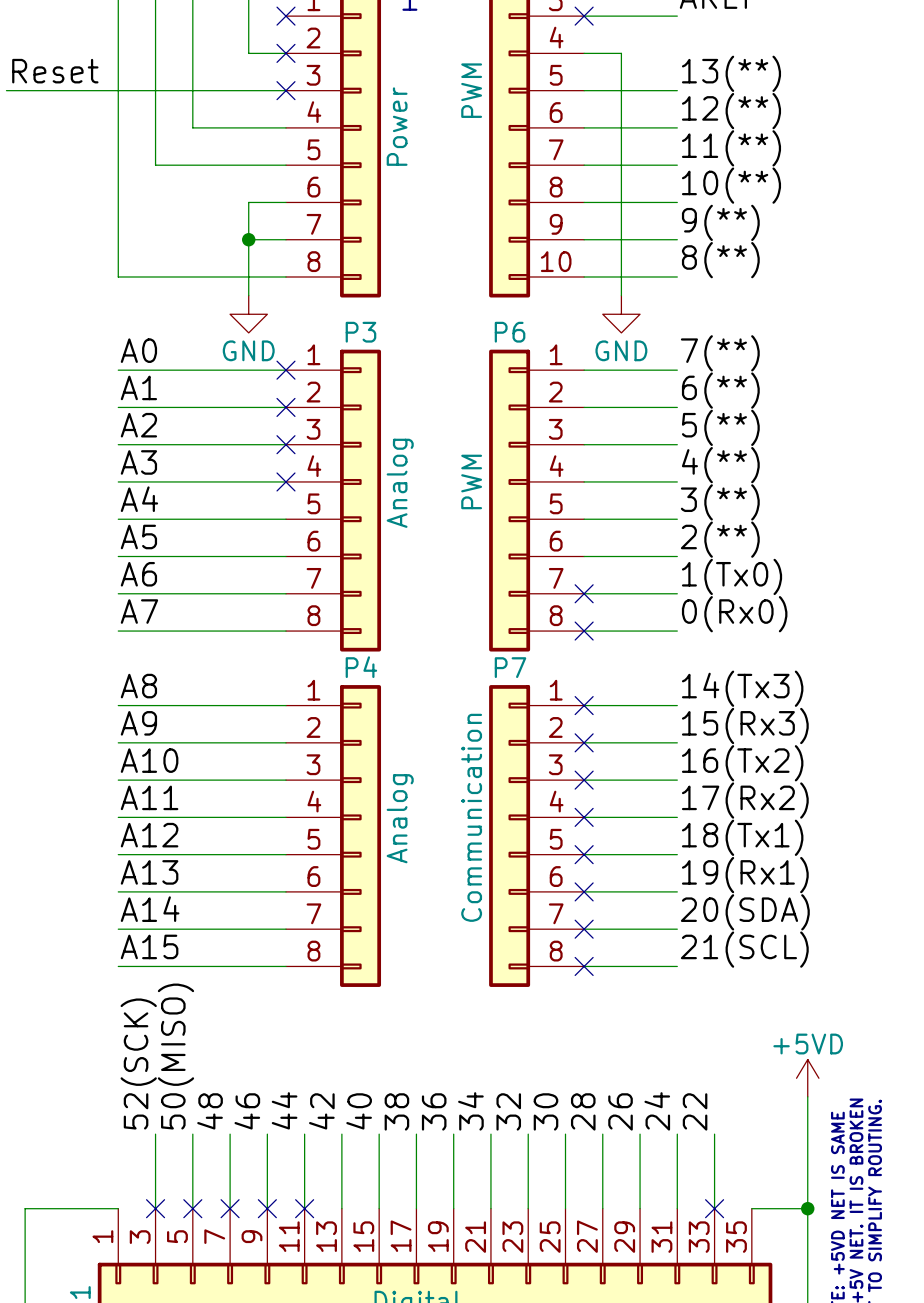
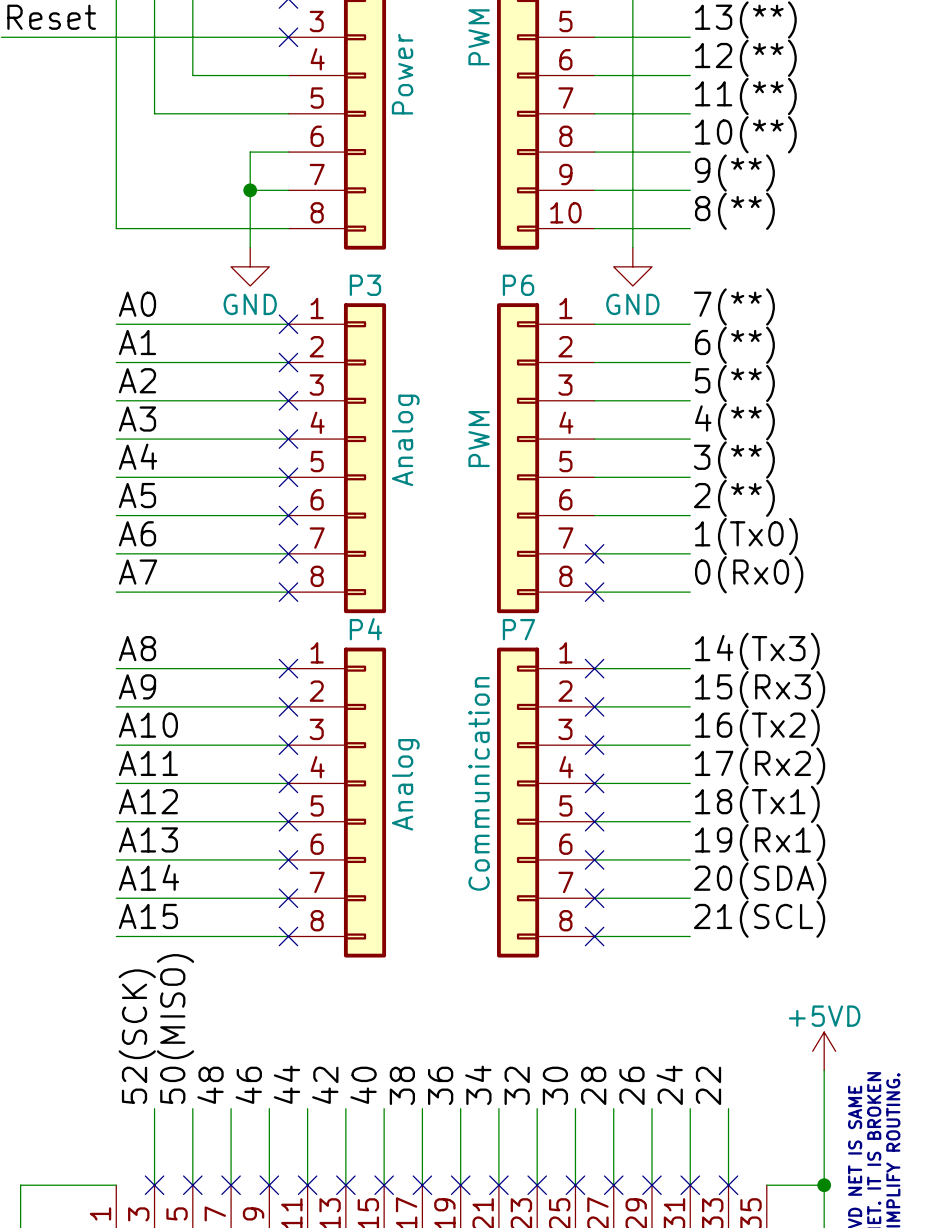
no-connect mark: none -> (288, 477)
no-connect mark: none -> (288, 515)
no-connect mark: none -> (288, 553)
no-connect mark: none -> (288, 592)
no-connect mark: none -> (288, 668)
no-connect mark: none -> (288, 706)
no-connect mark: none -> (288, 745)
no-connect mark: none -> (288, 783)
no-connect mark: none -> (288, 821)
no-connect mark: none -> (288, 859)
no-connect mark: none -> (288, 898)
no-connect mark: none -> (288, 936)
no-connect mark: none -> (345, 1185)
no-connect mark: none -> (384, 1185)
no-connect mark: none -> (422, 1185)
no-connect mark: none -> (460, 1185)
no-connect mark: none -> (498, 1185)
no-connect mark: none -> (537, 1185)
no-connect mark: none -> (575, 1185)
no-connect mark: none -> (613, 1185)
no-connect mark: none -> (651, 1185)
no-connect mark: none -> (690, 1185)

